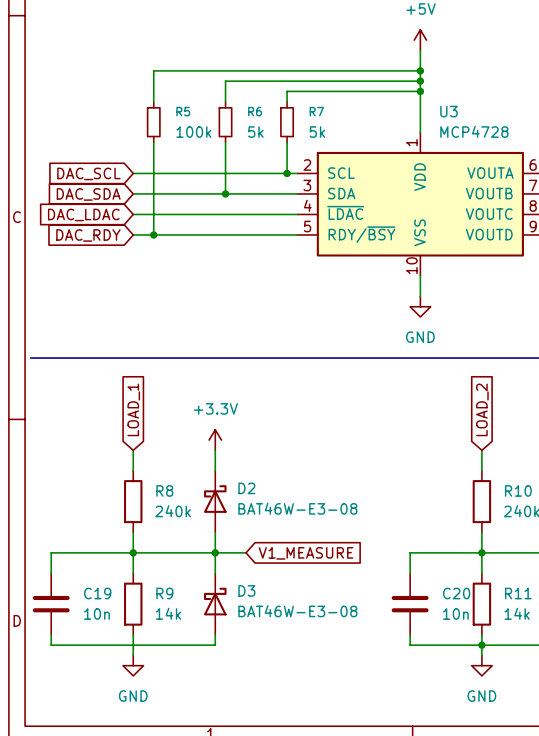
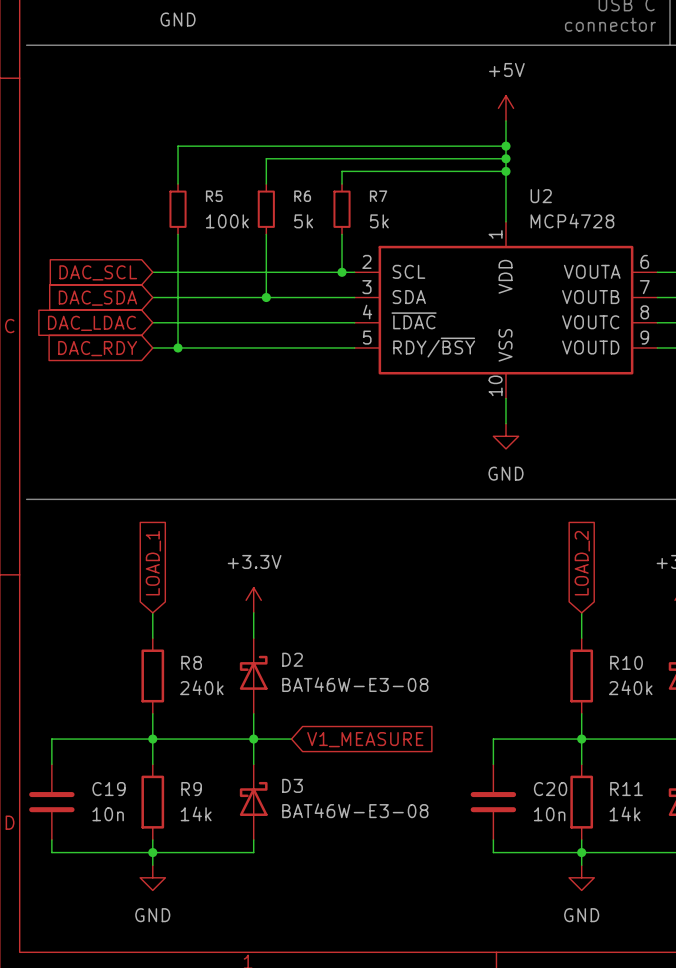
U3 name: U3 (448, 111) -> U2 (541, 196)
junction: none -> (152, 852)

